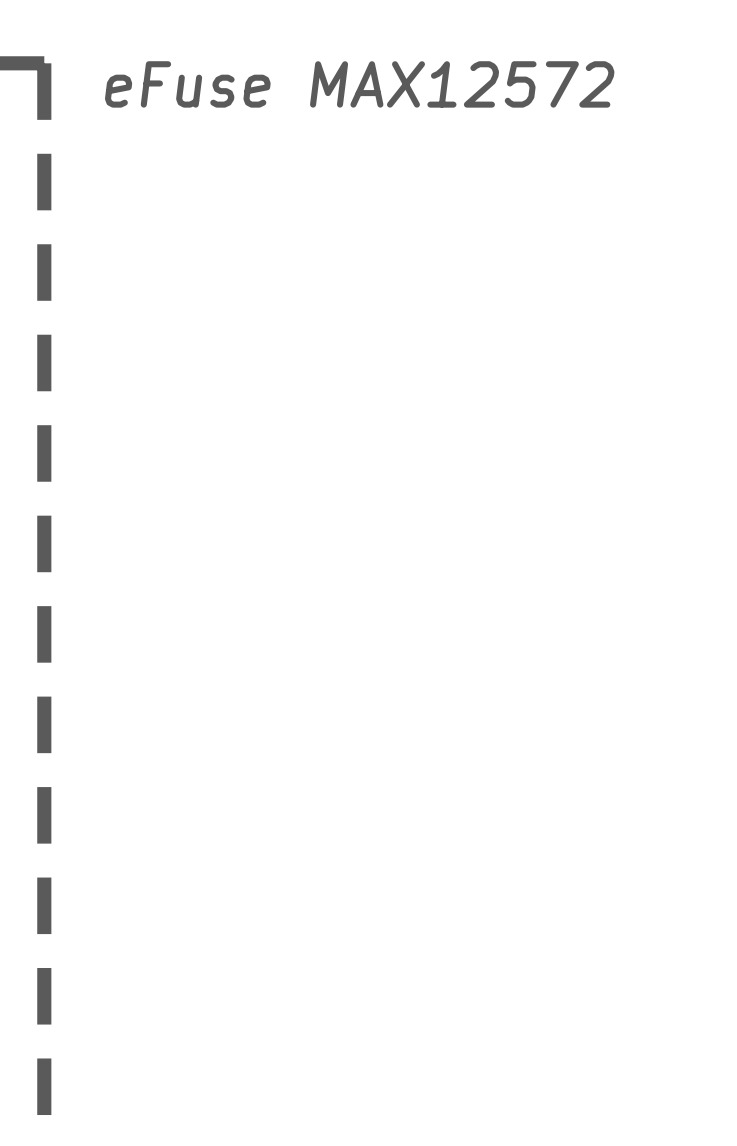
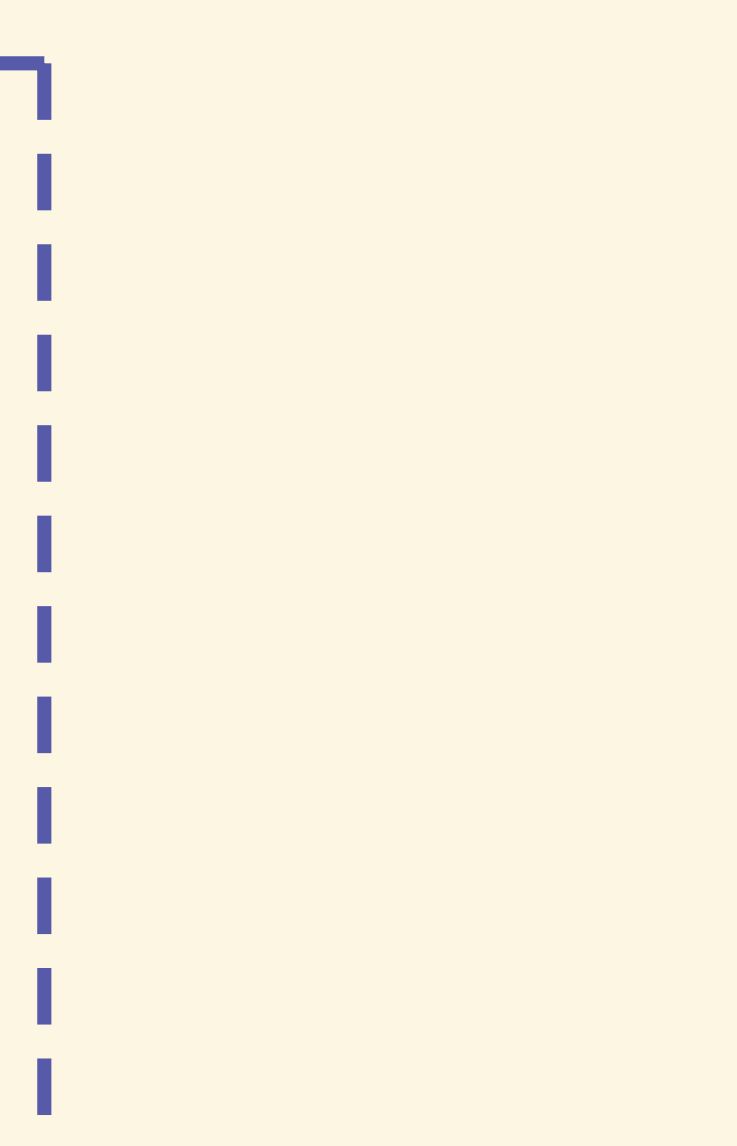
text: eFuse MAX12572 (359, 84) -> none

